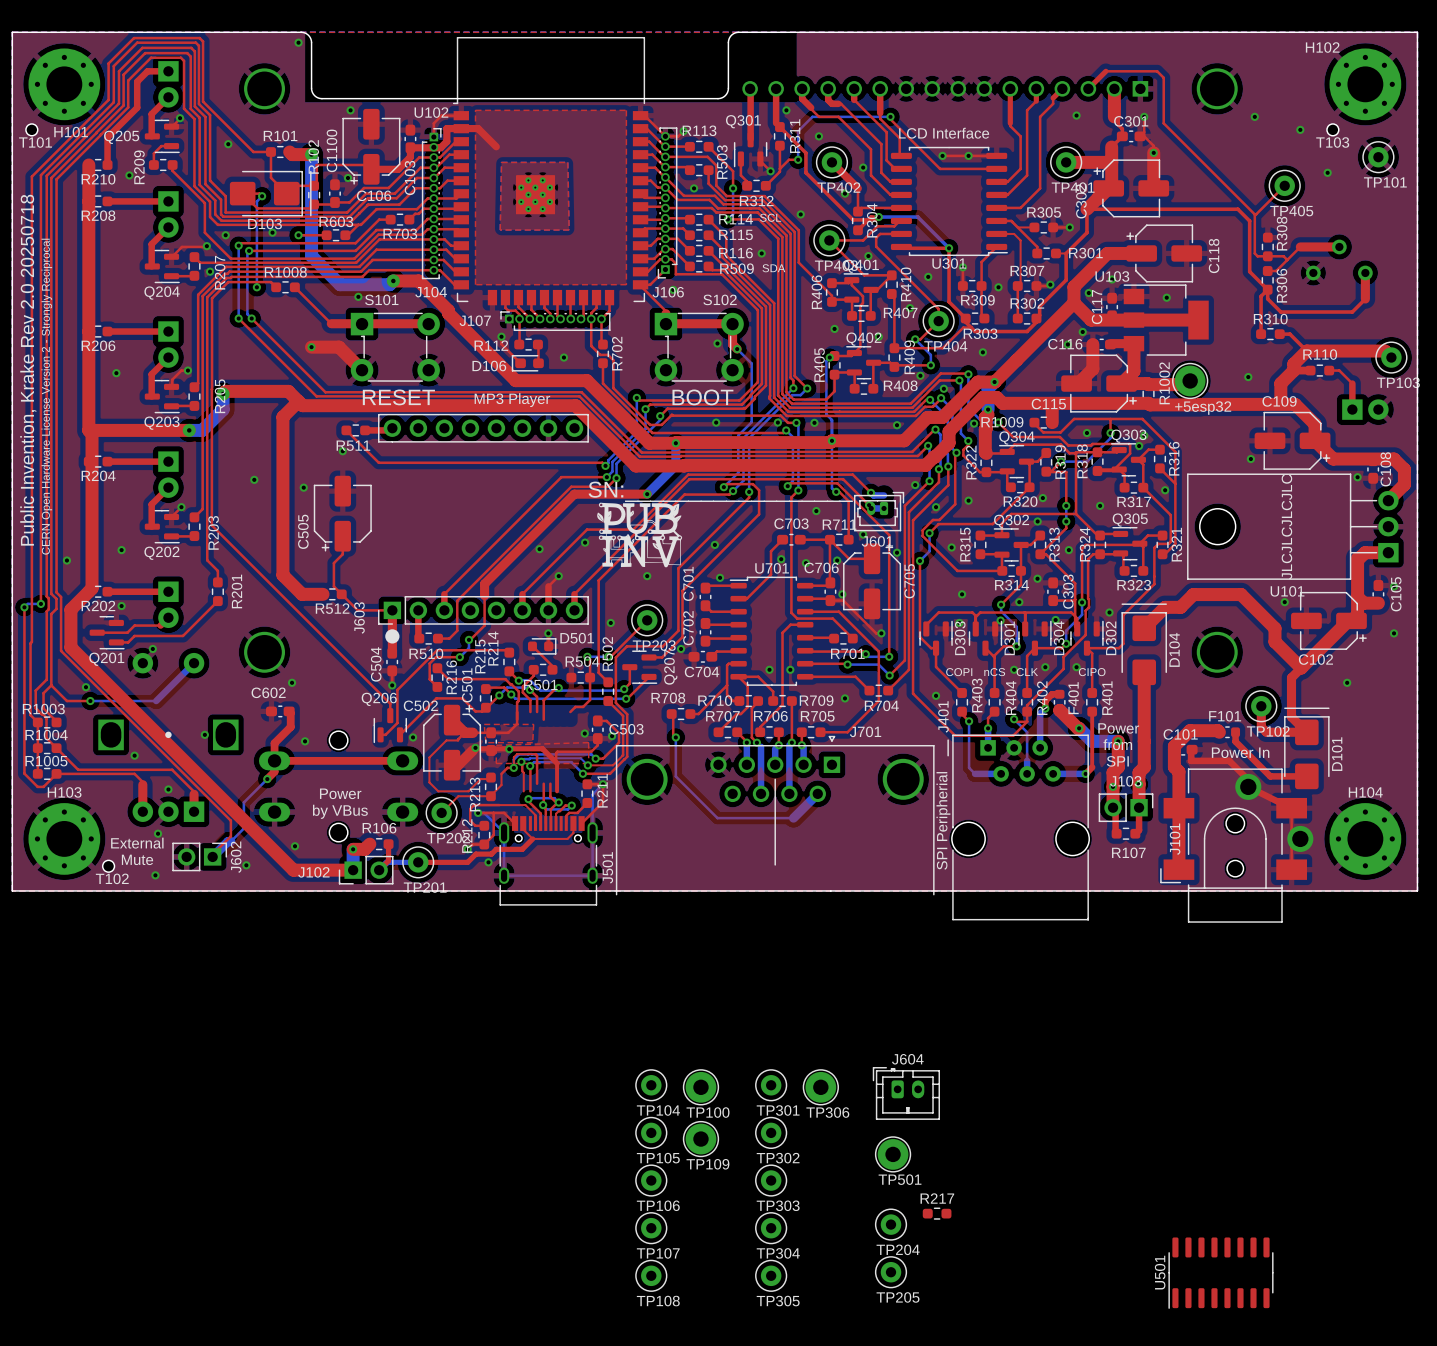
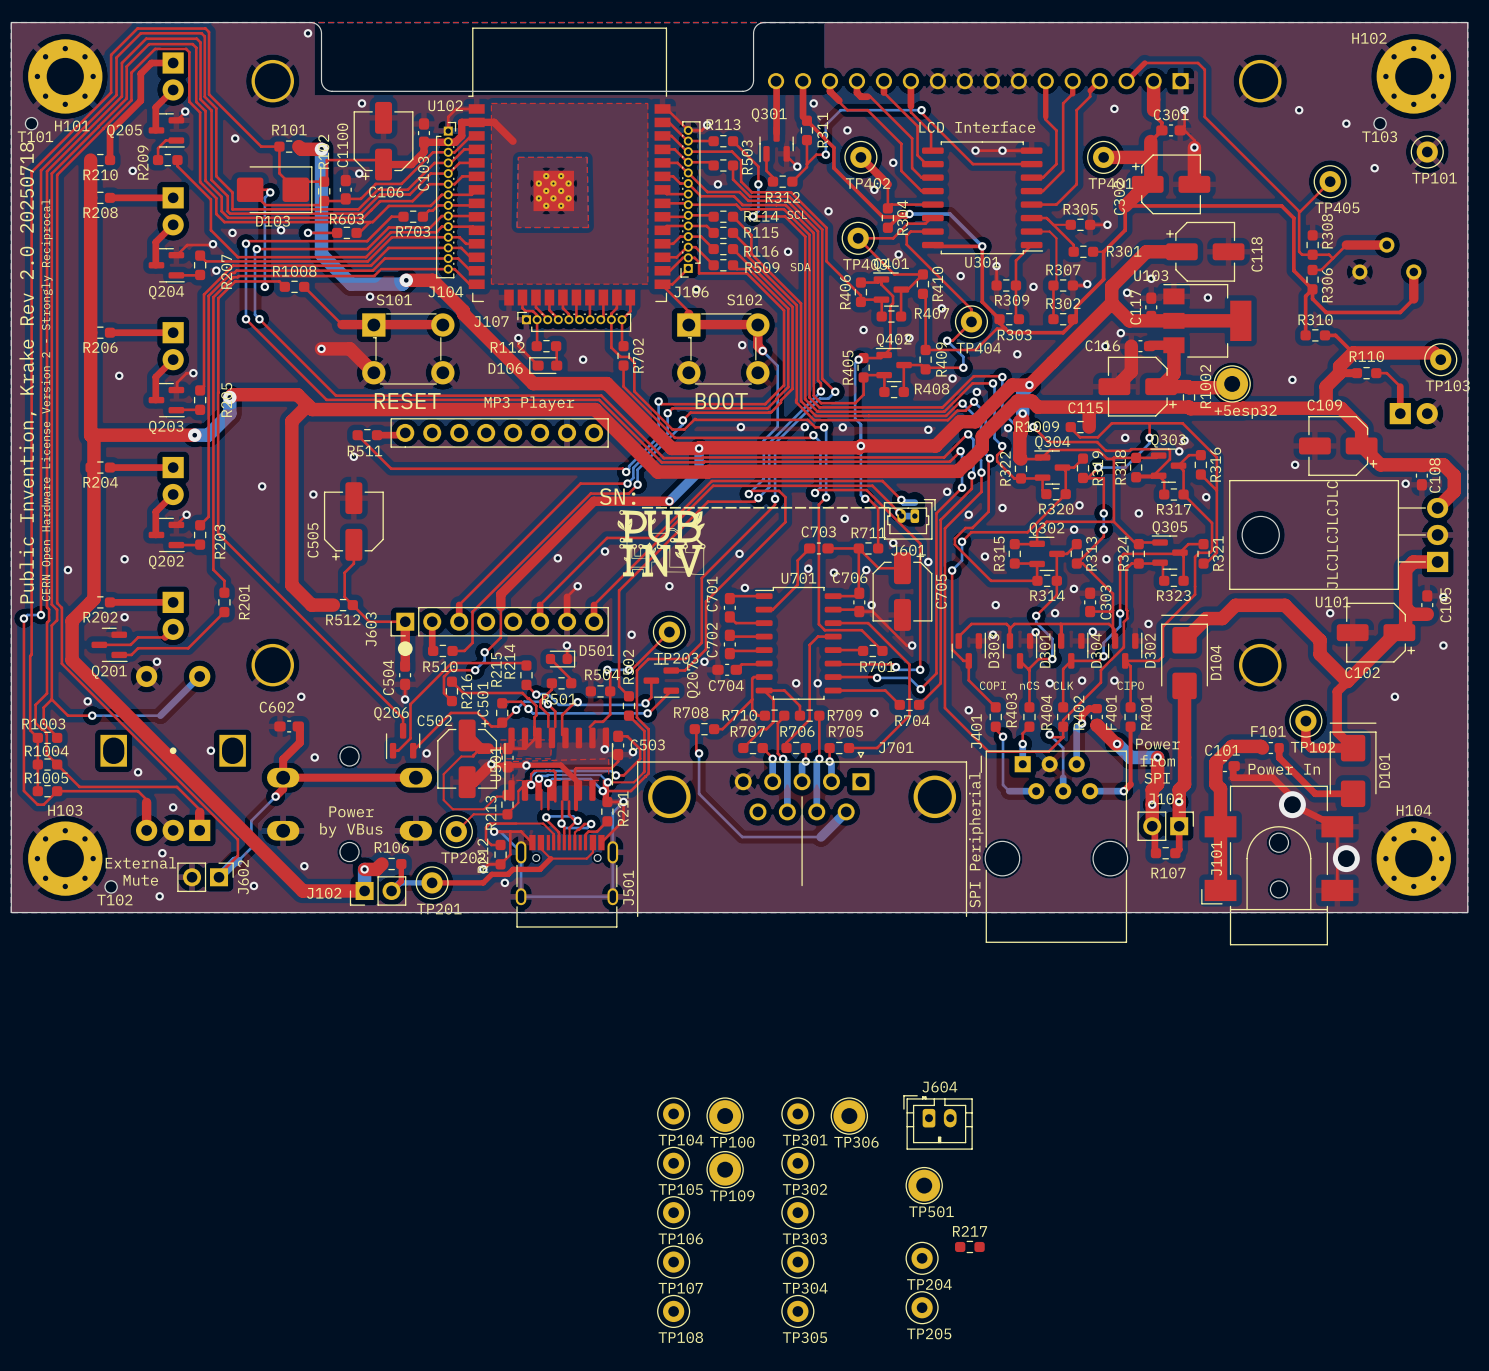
U501 position: (1220, 1273) -> (558, 764)

